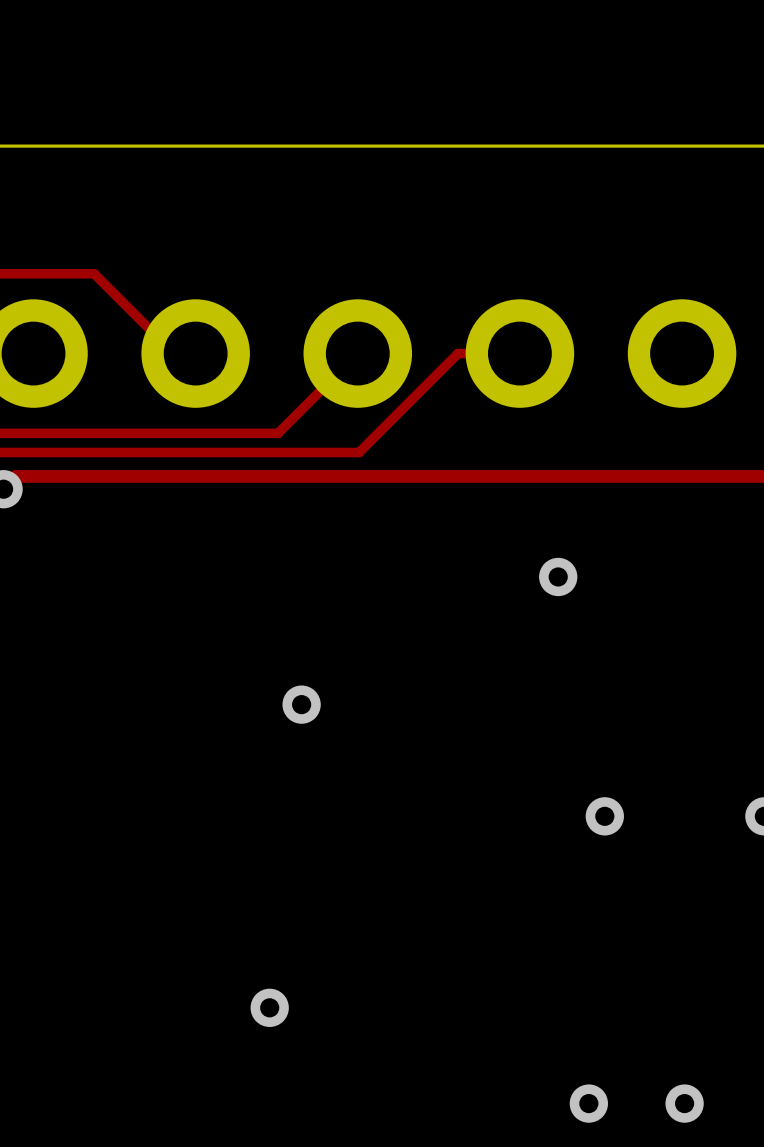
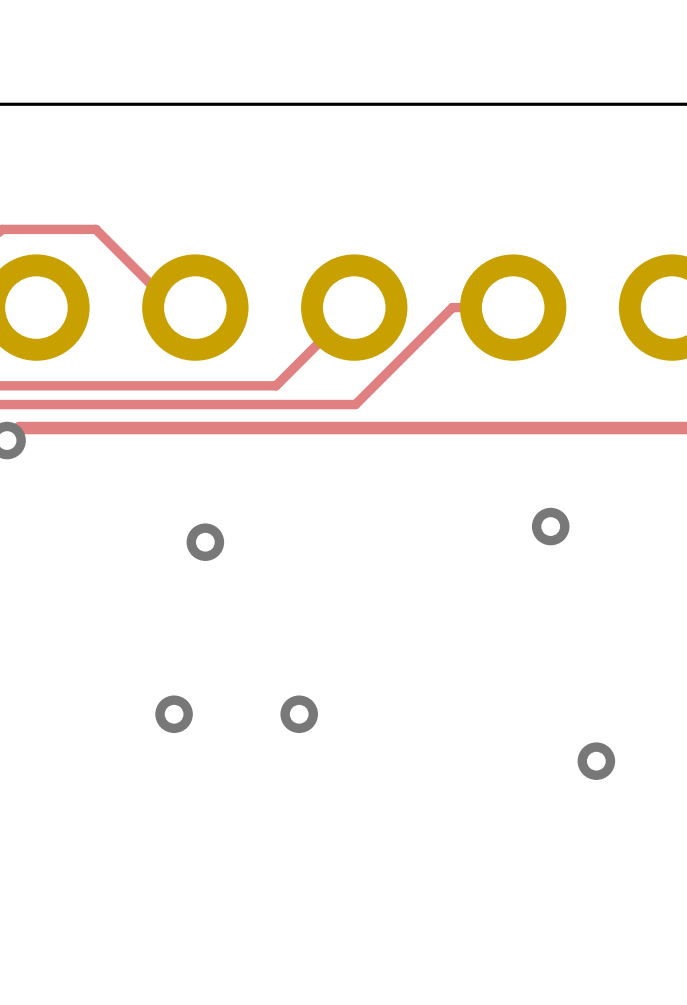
via: none -> (205, 542)
via position: (301, 704) -> (299, 714)
via: none -> (174, 714)
via: (269, 1007) -> none

